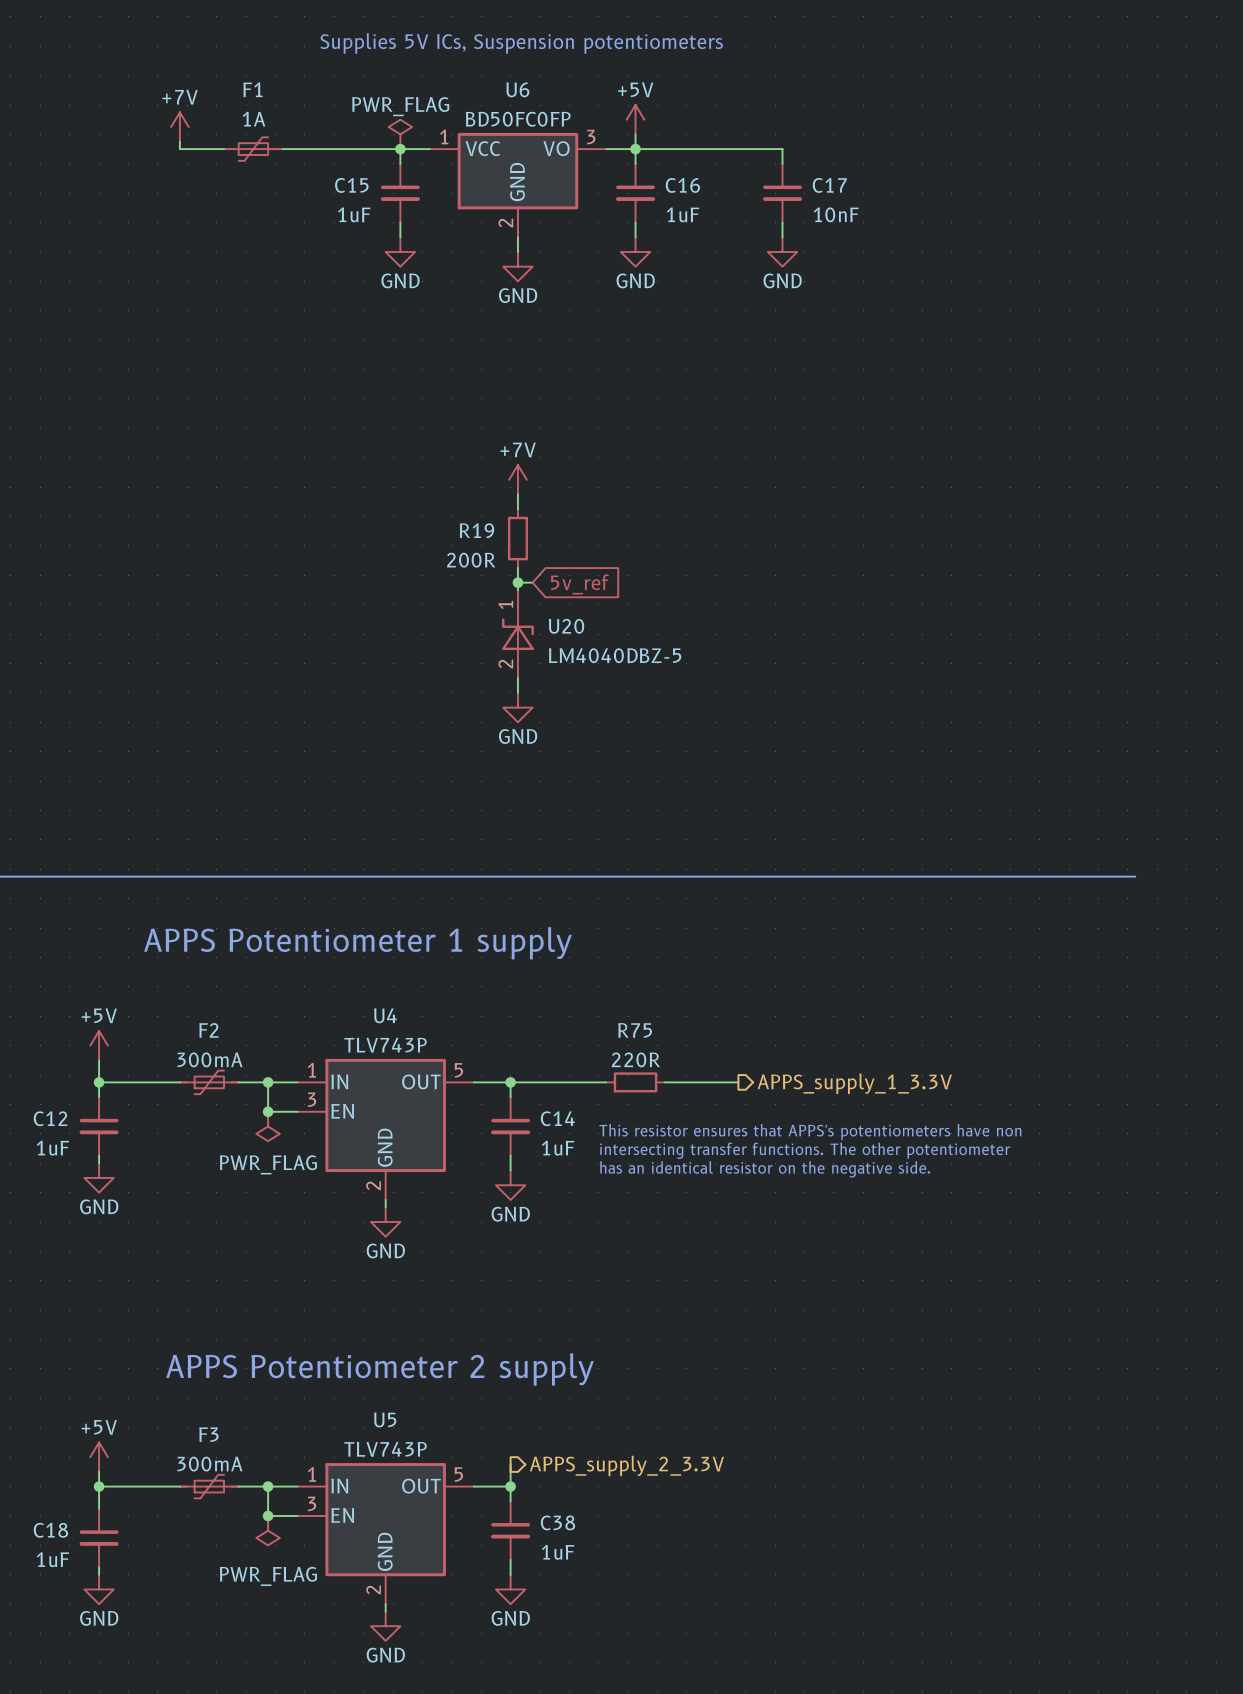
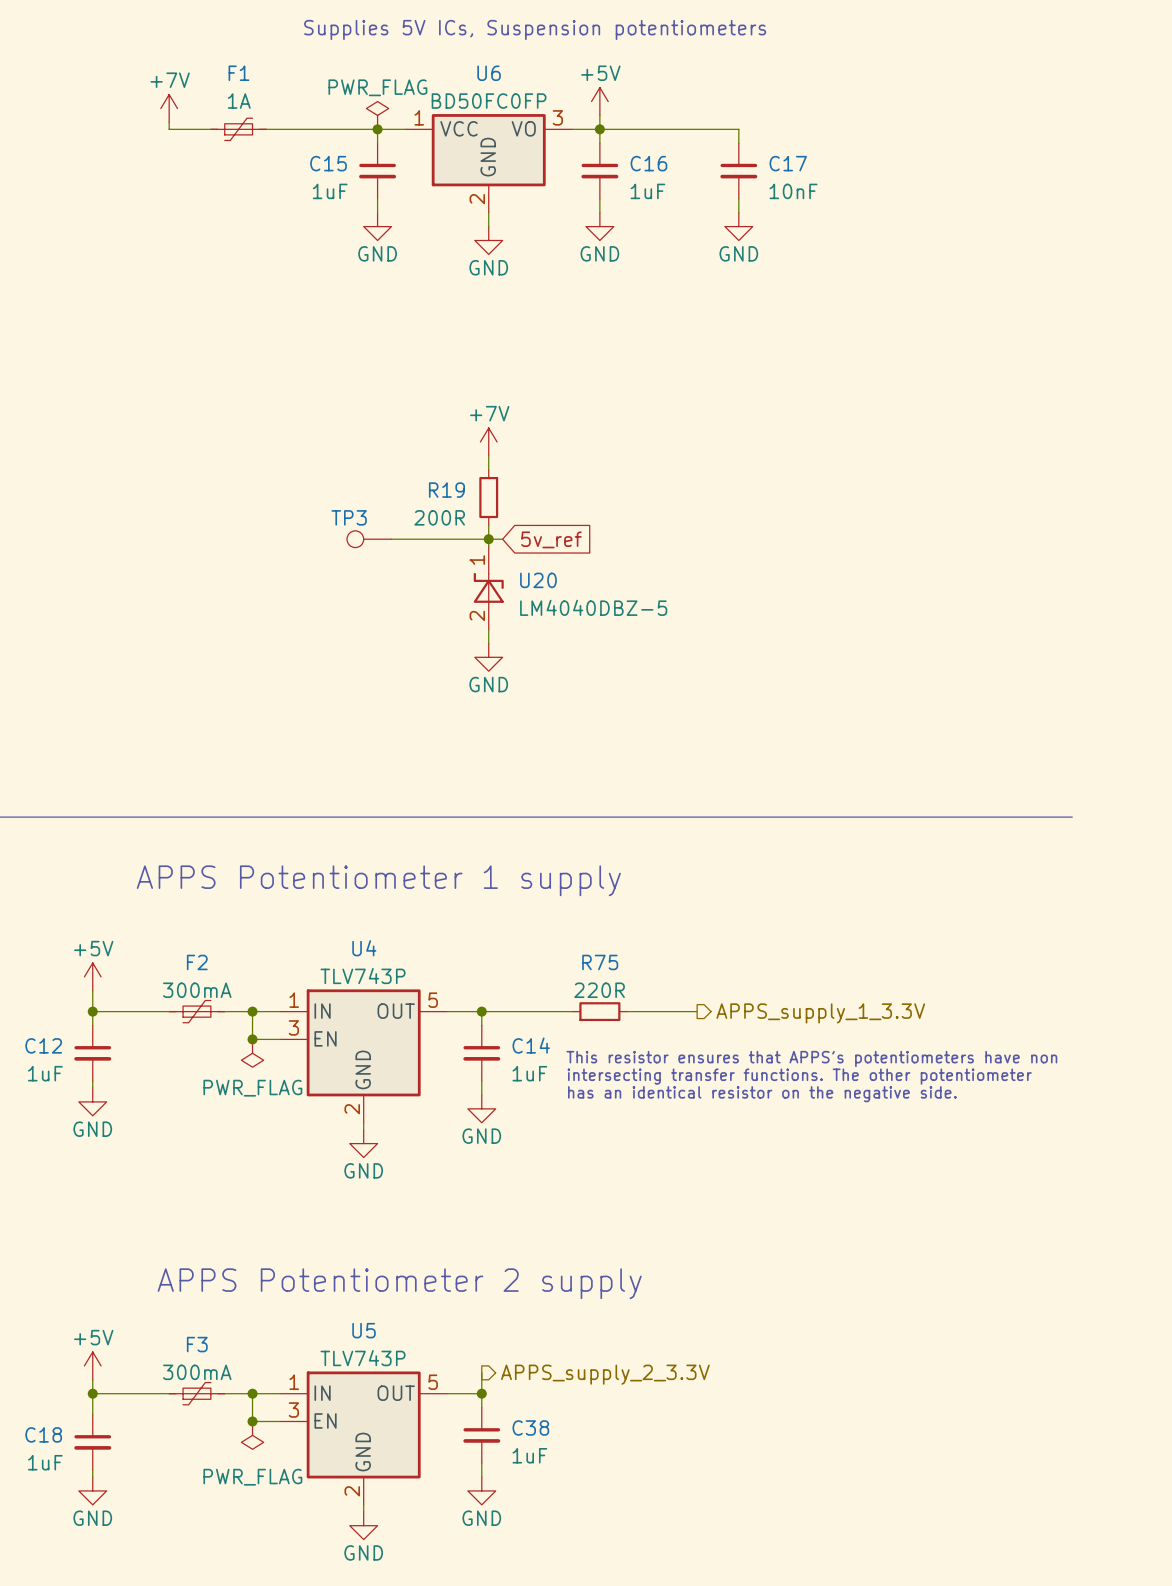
TP3: none -> (369, 539)
wire: none -> (391, 539) (488, 539)

